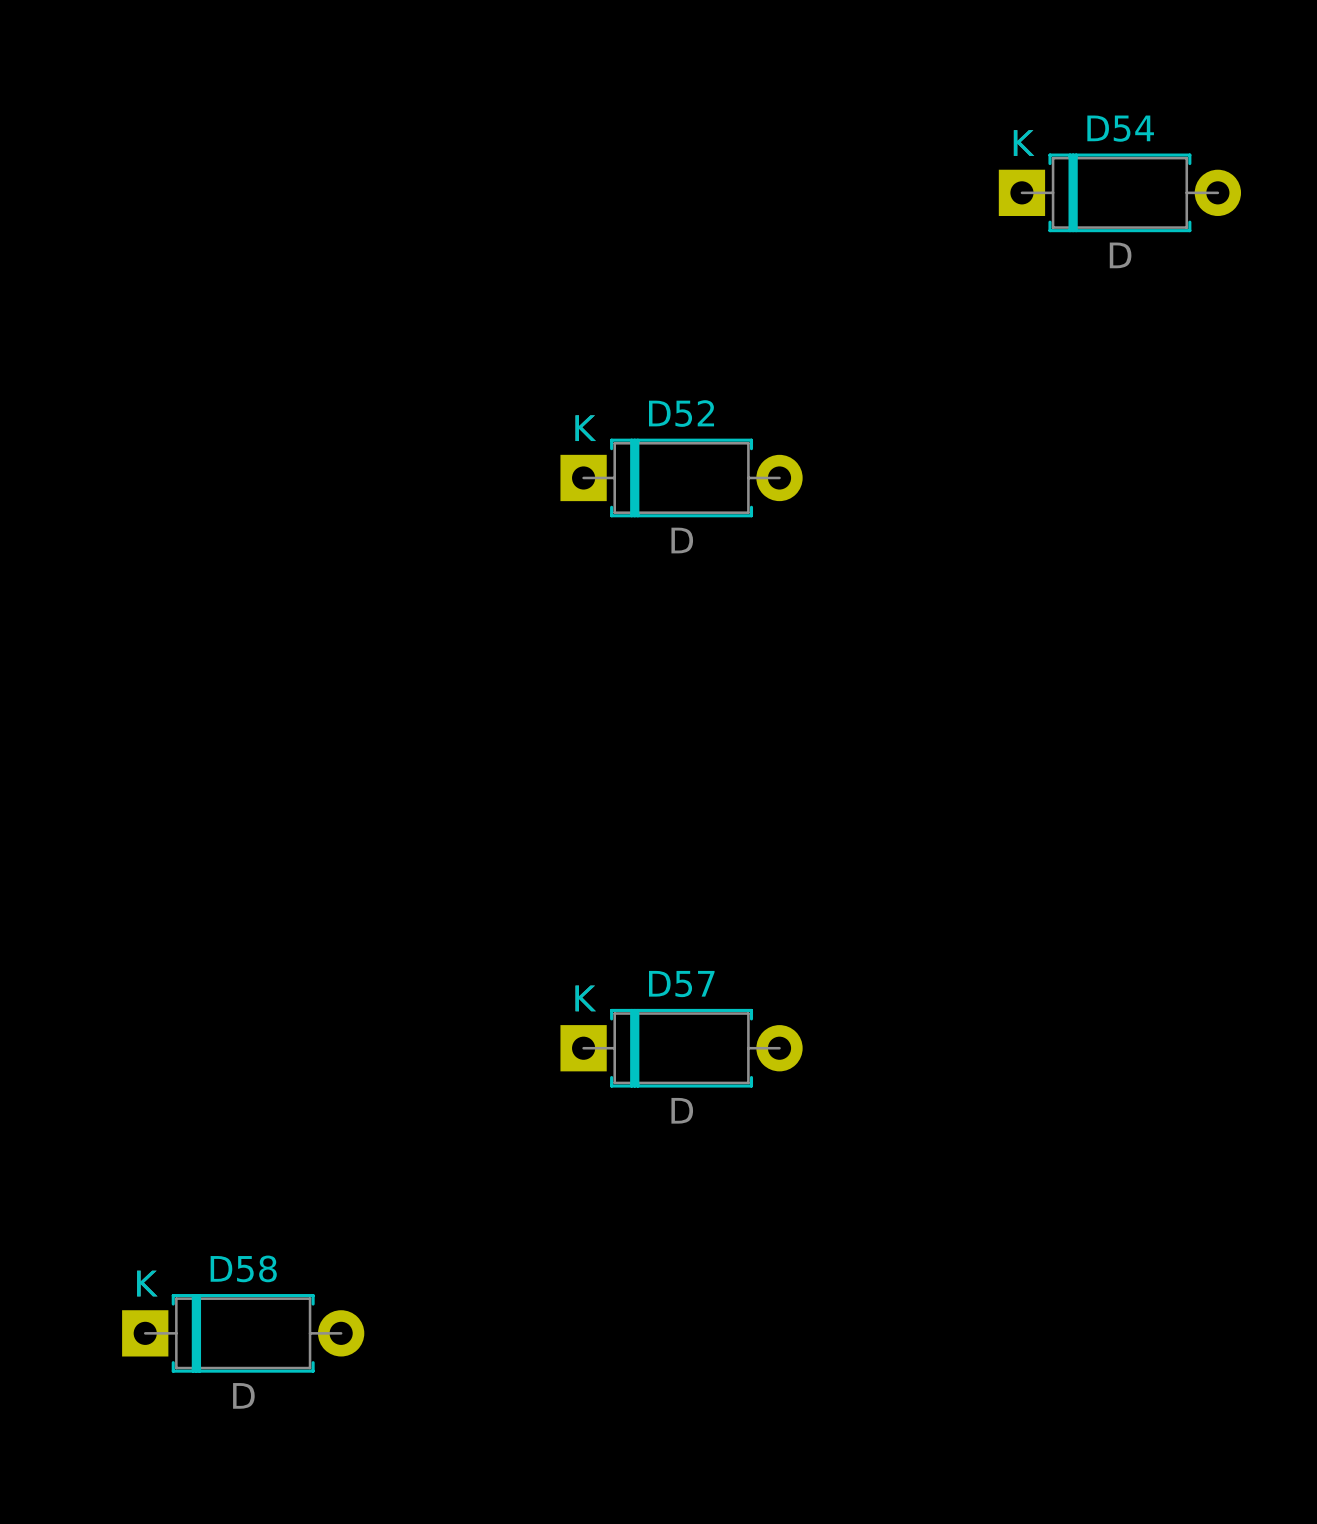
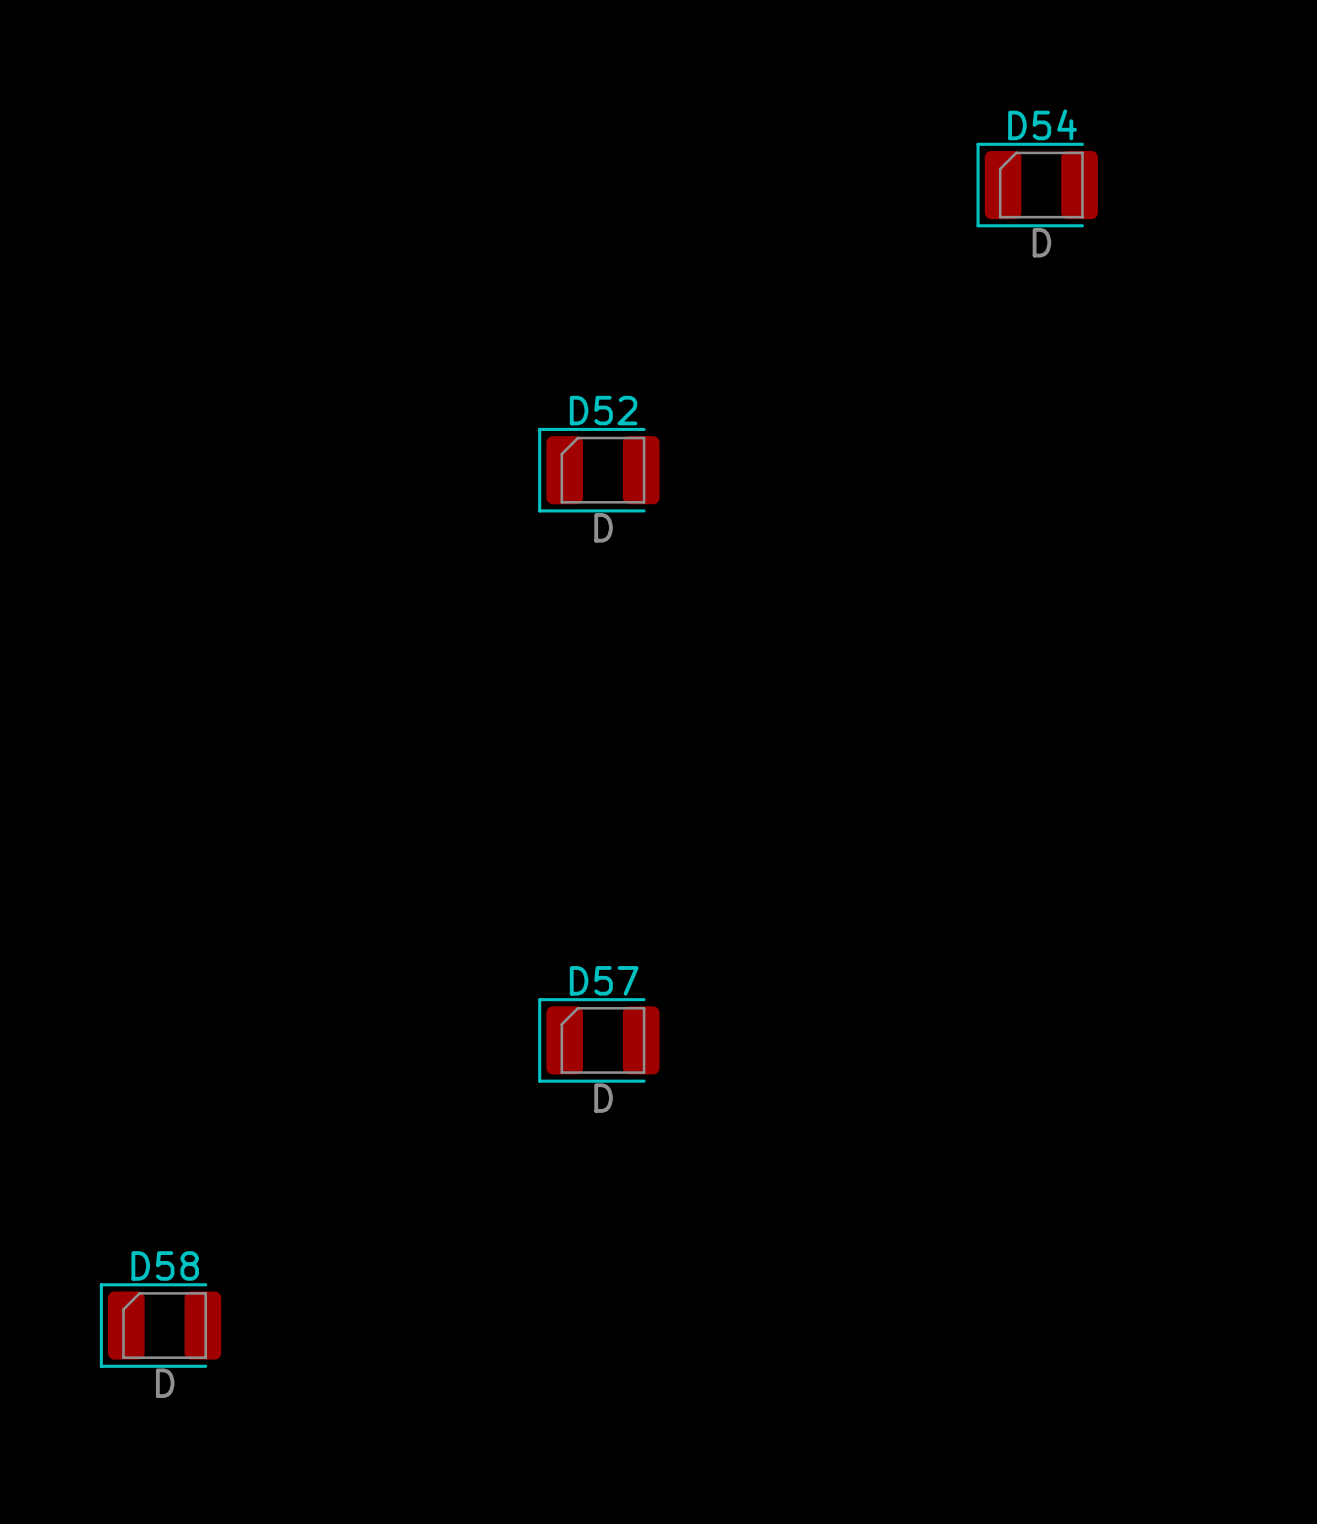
D54 footprint: [998, 153, 1242, 233] -> [976, 142, 1098, 228]
D52 footprint: [560, 438, 803, 518] -> [538, 427, 660, 513]
D57 footprint: [560, 1008, 803, 1088] -> [538, 998, 660, 1083]
D58 footprint: [122, 1294, 365, 1373] -> [99, 1283, 222, 1368]

